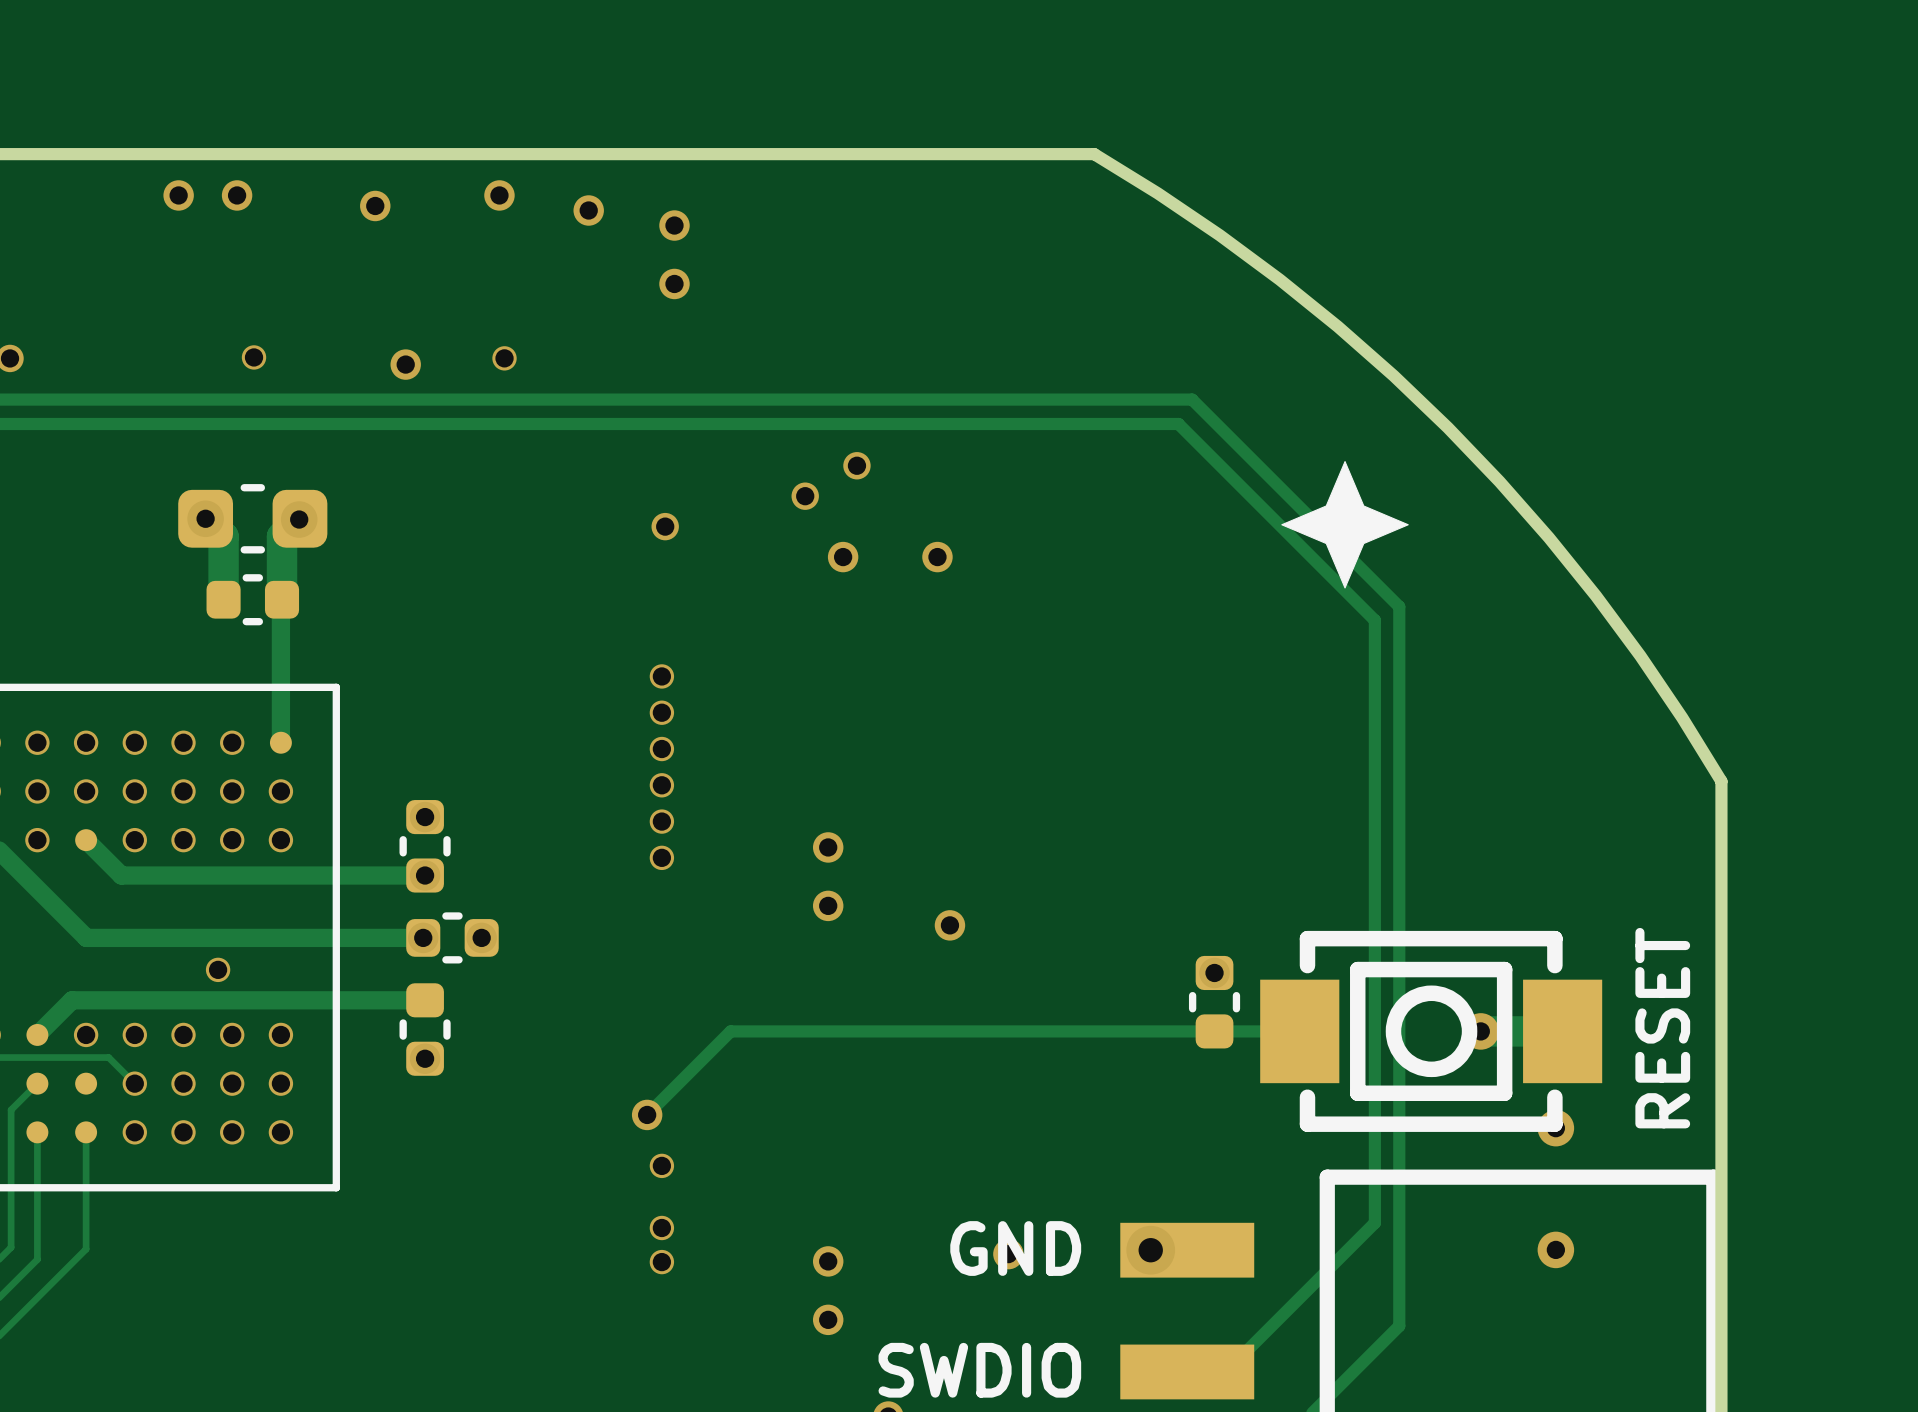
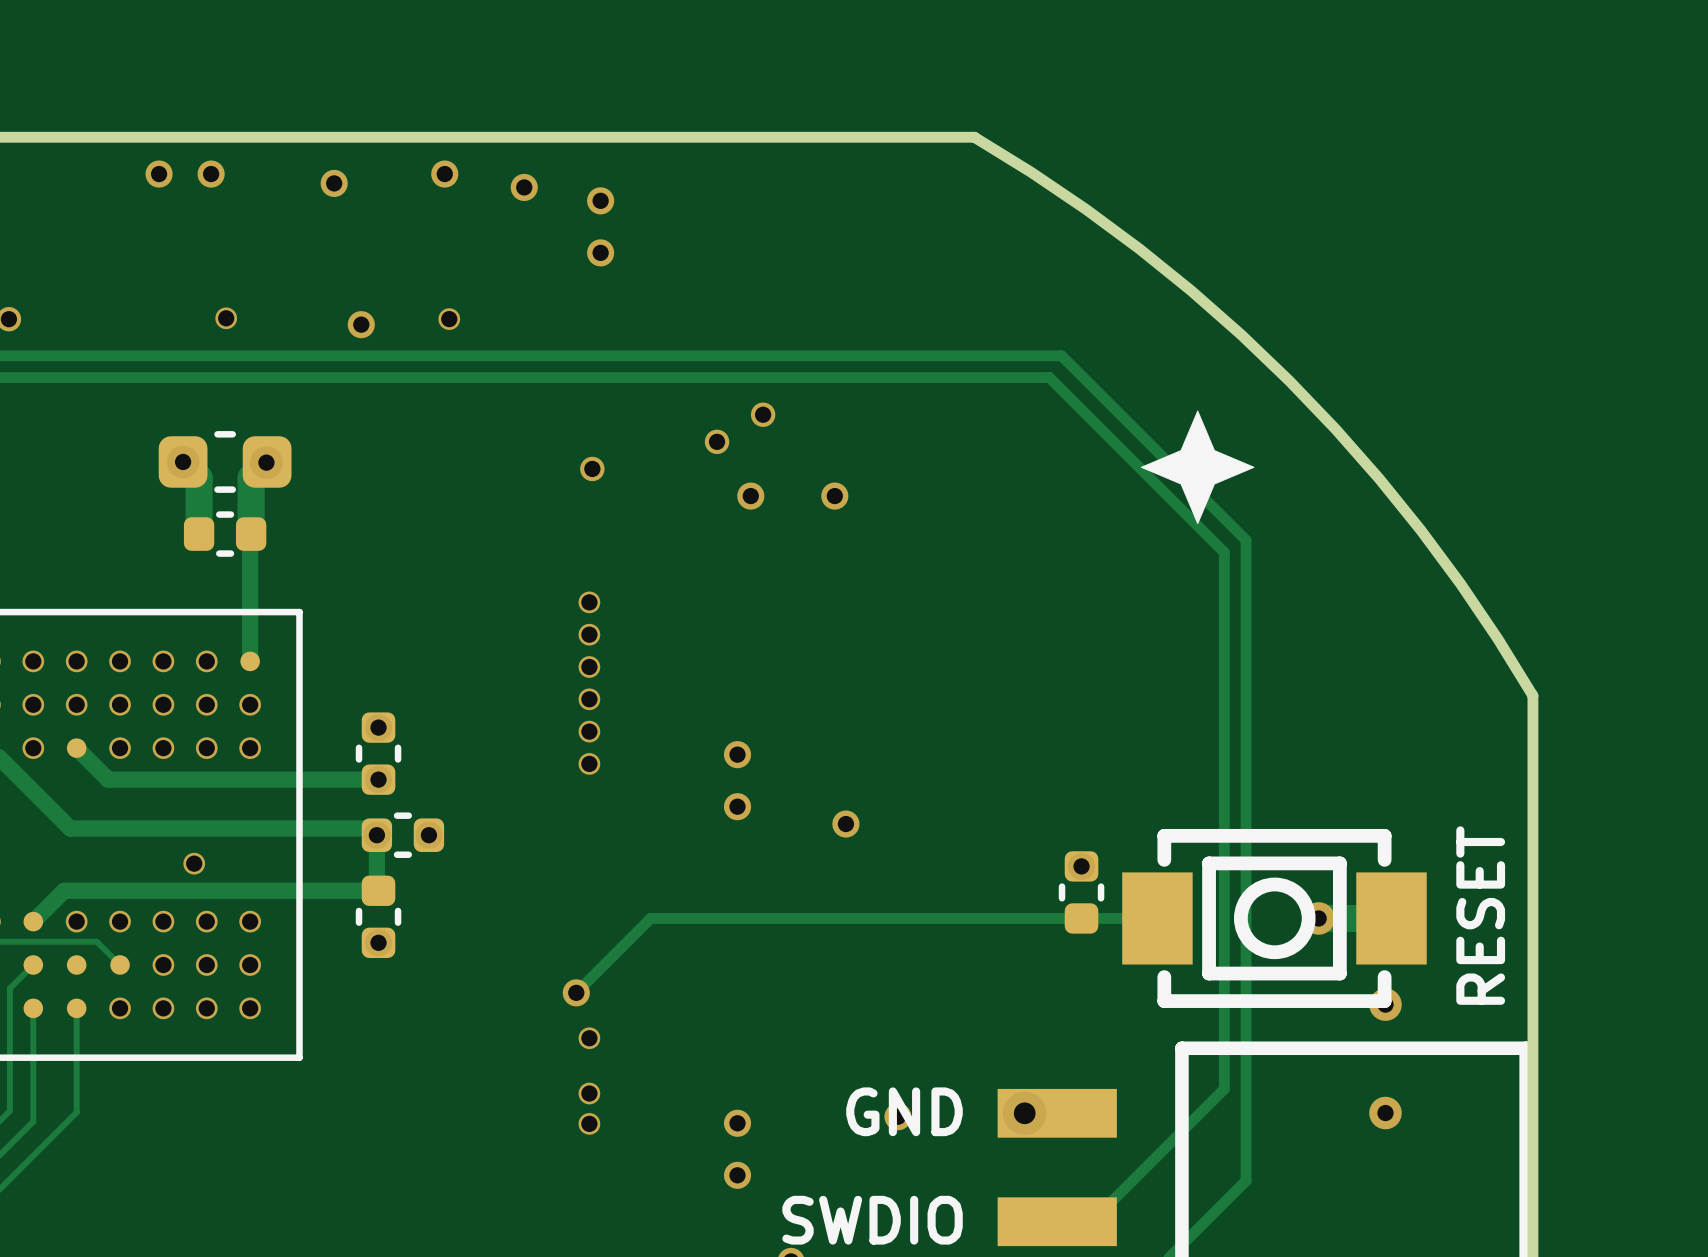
track: (78, 930) (86, 937) (423, 937) -> (70, 828) (370, 828) (376, 835) (376, 889) (378, 890)
via: (134, 1083) -> none

